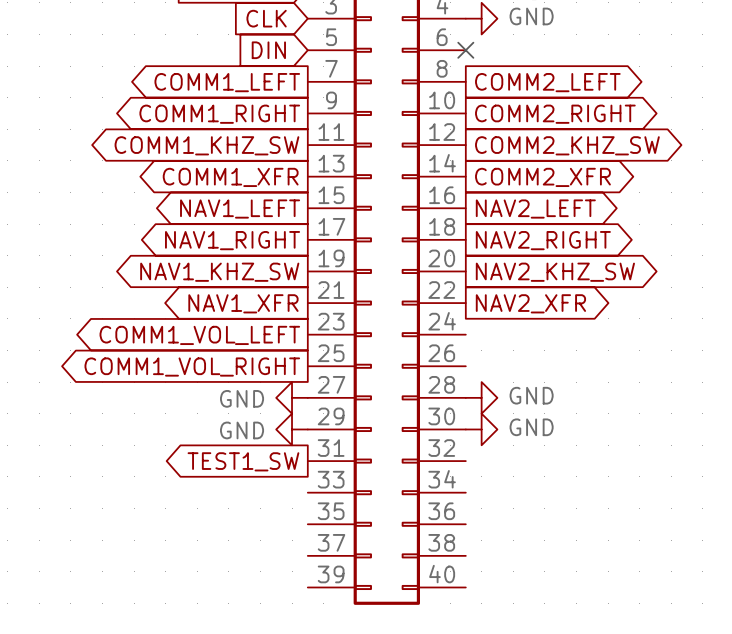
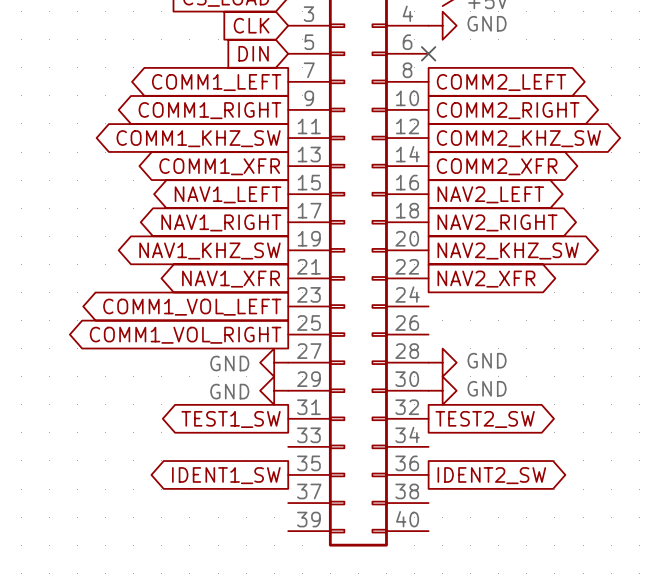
global label: none -> TEST2_SW (485, 419)
global label: none -> IDENT1_SW (226, 475)
global label: none -> IDENT2_SW (491, 475)

